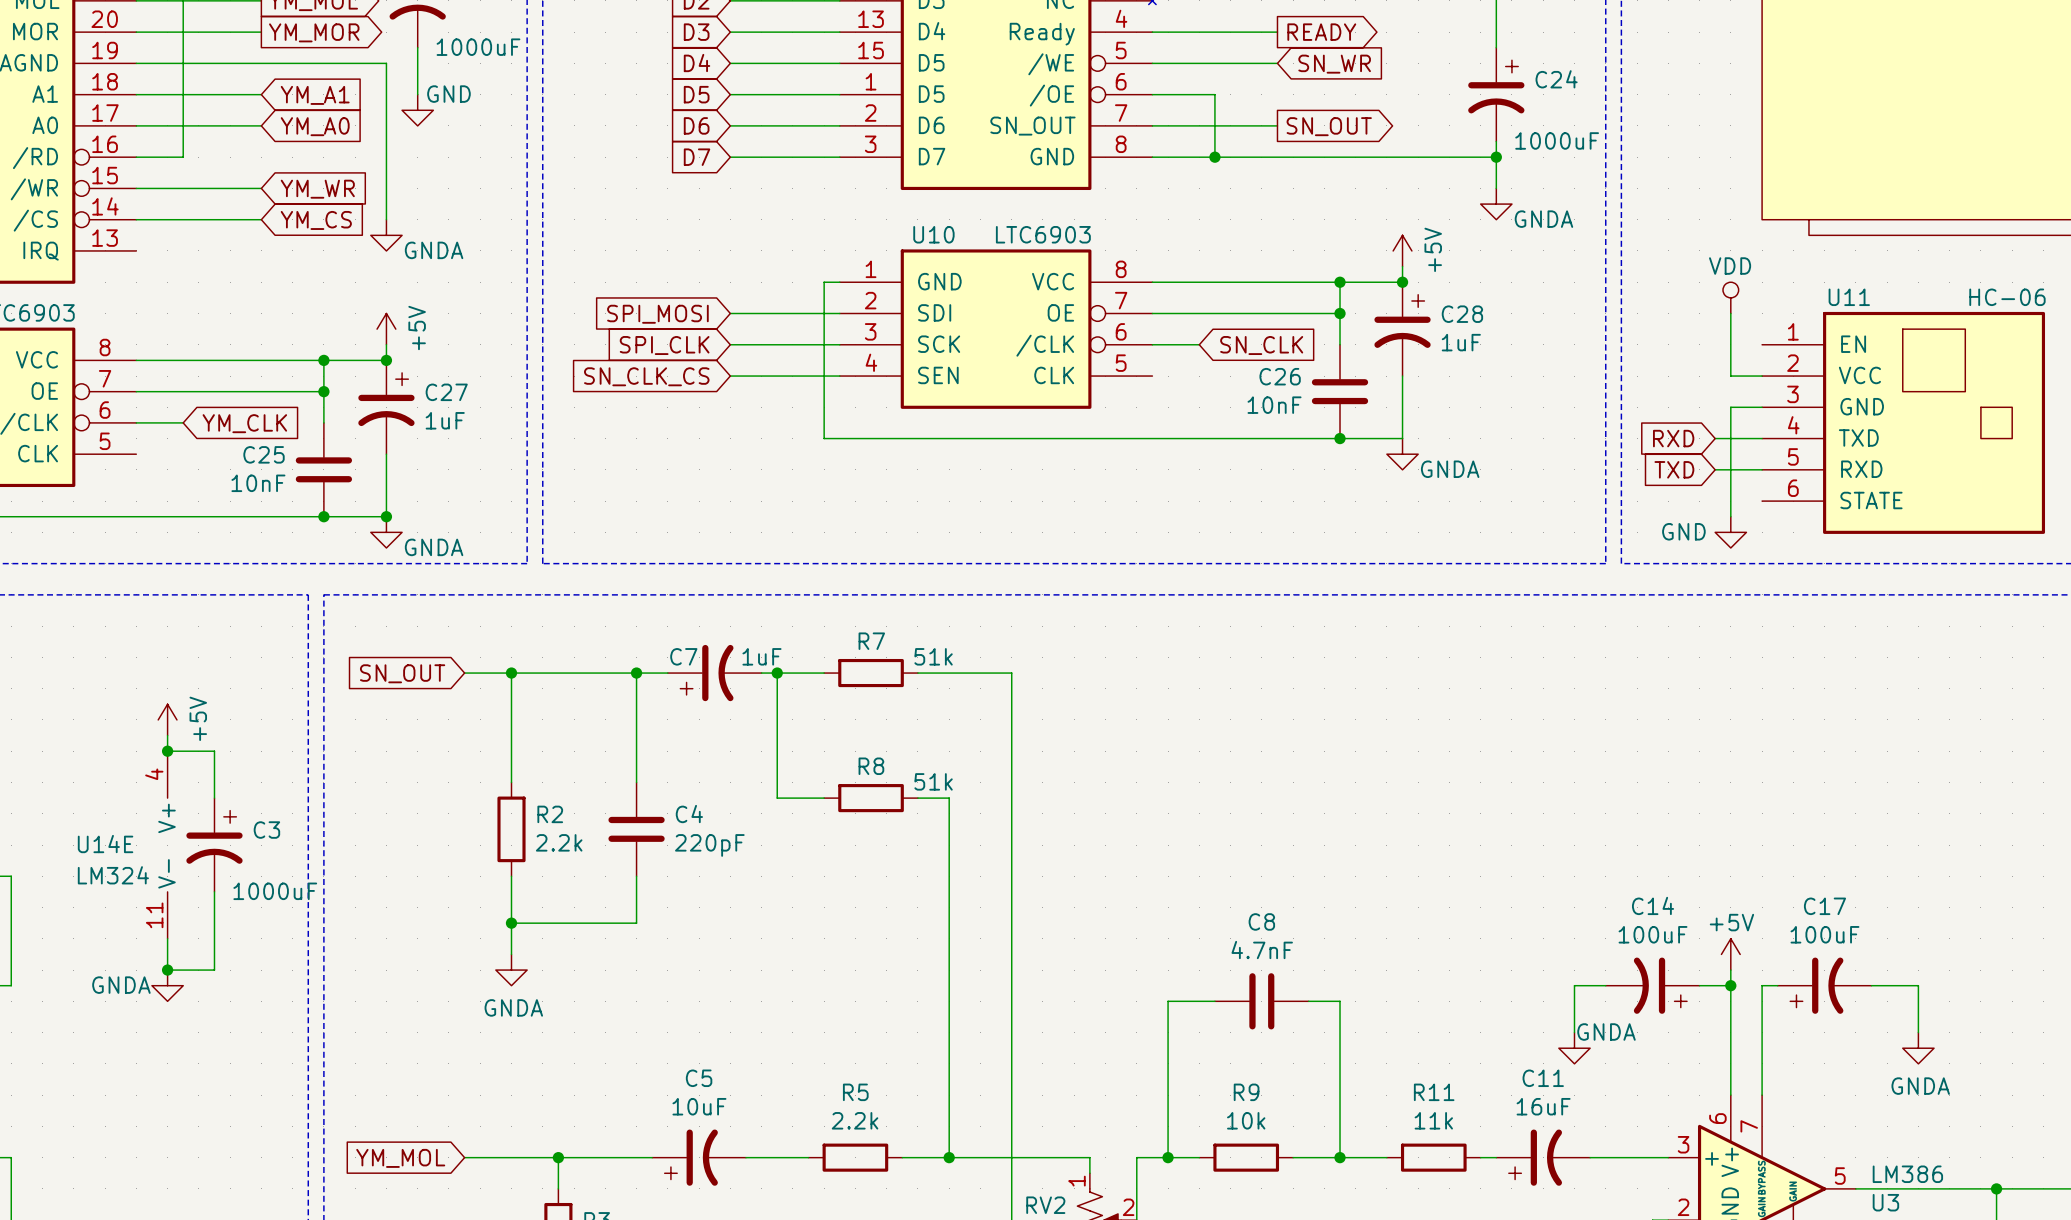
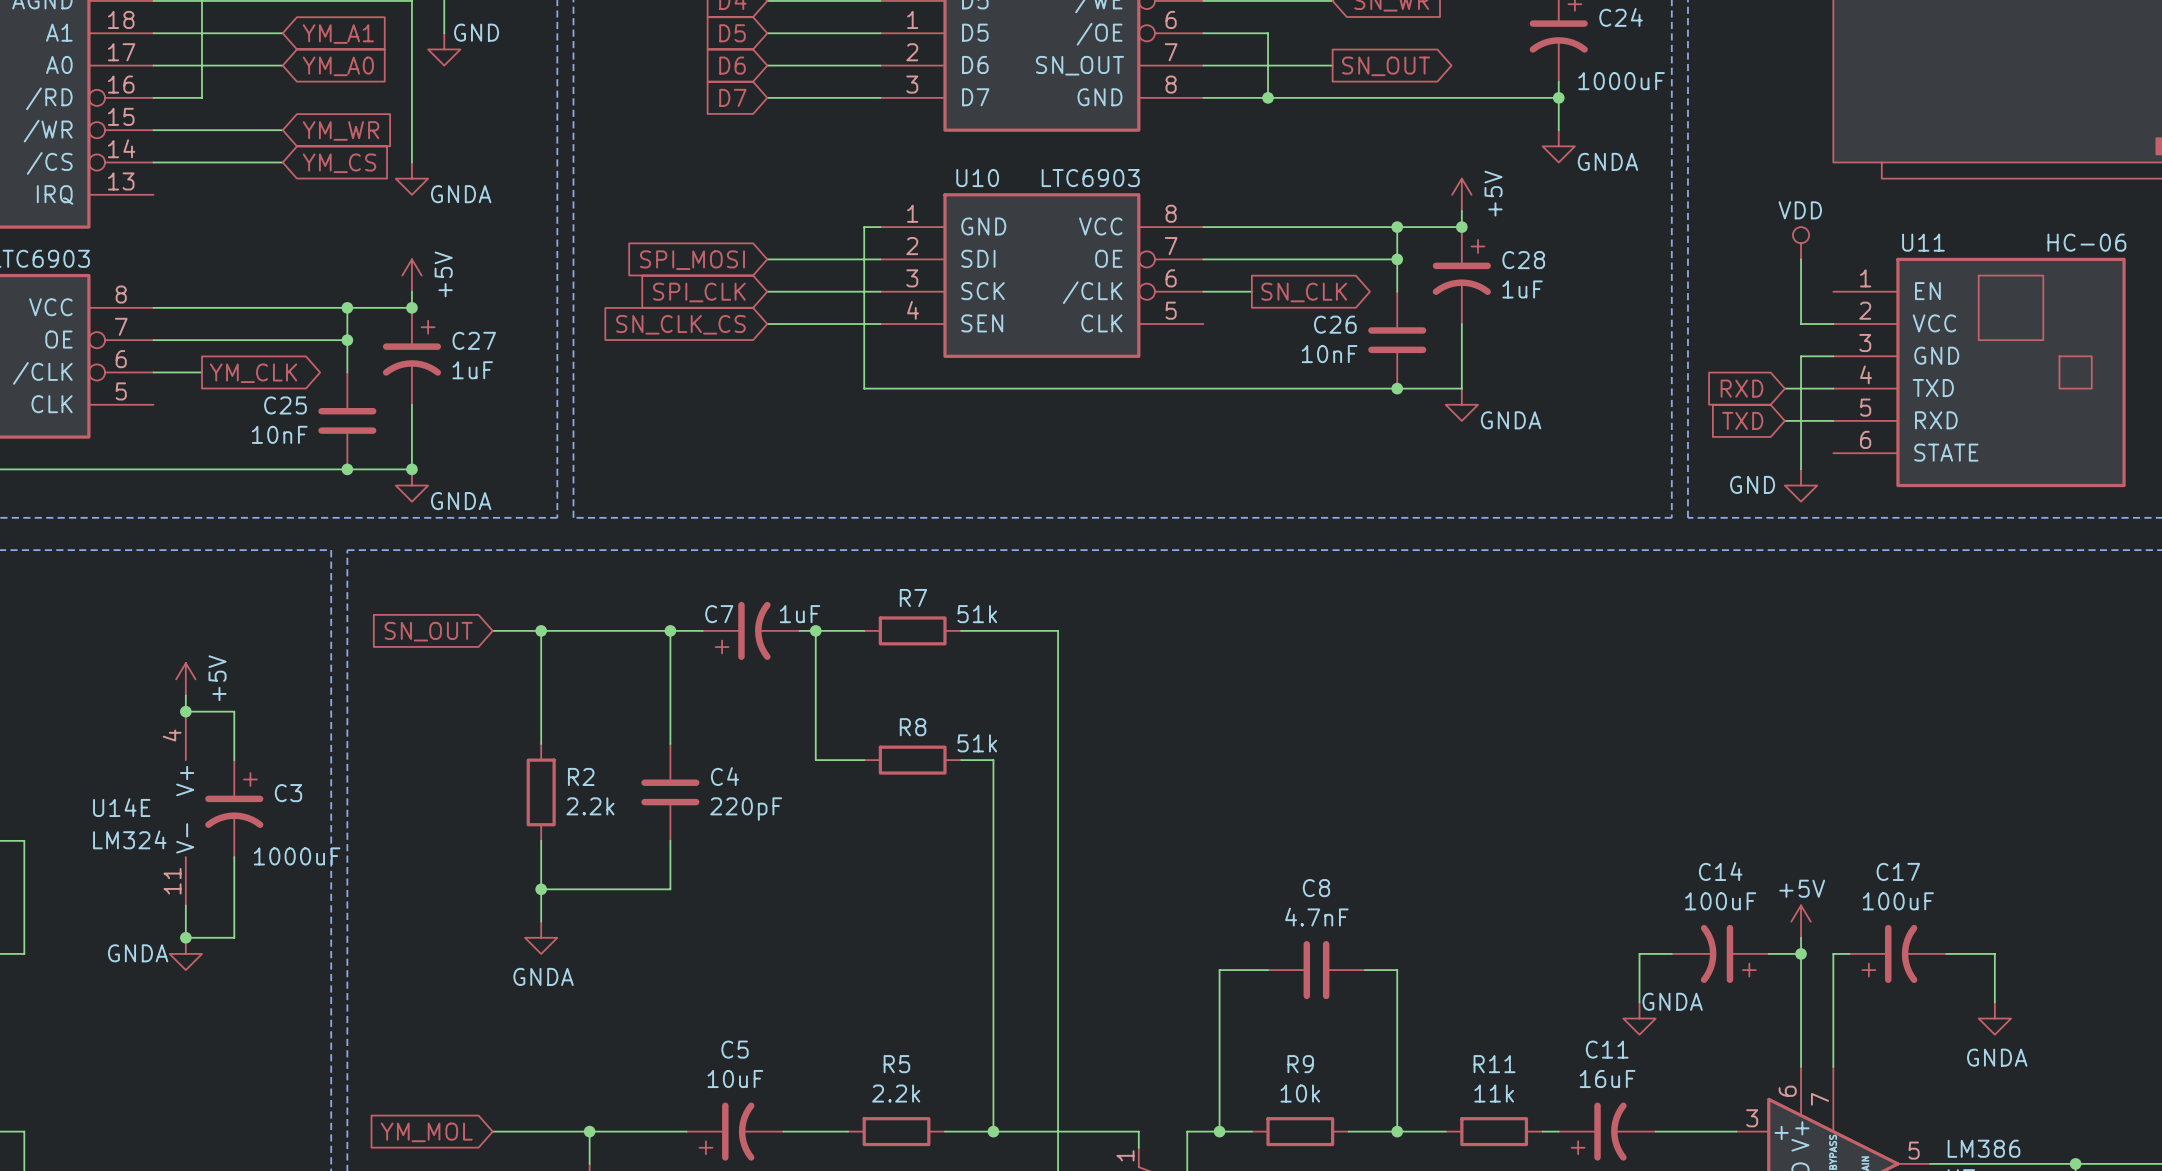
global label shape: input (1261, 345) -> output (1304, 292)
global label shape: input (244, 423) -> output (253, 373)

